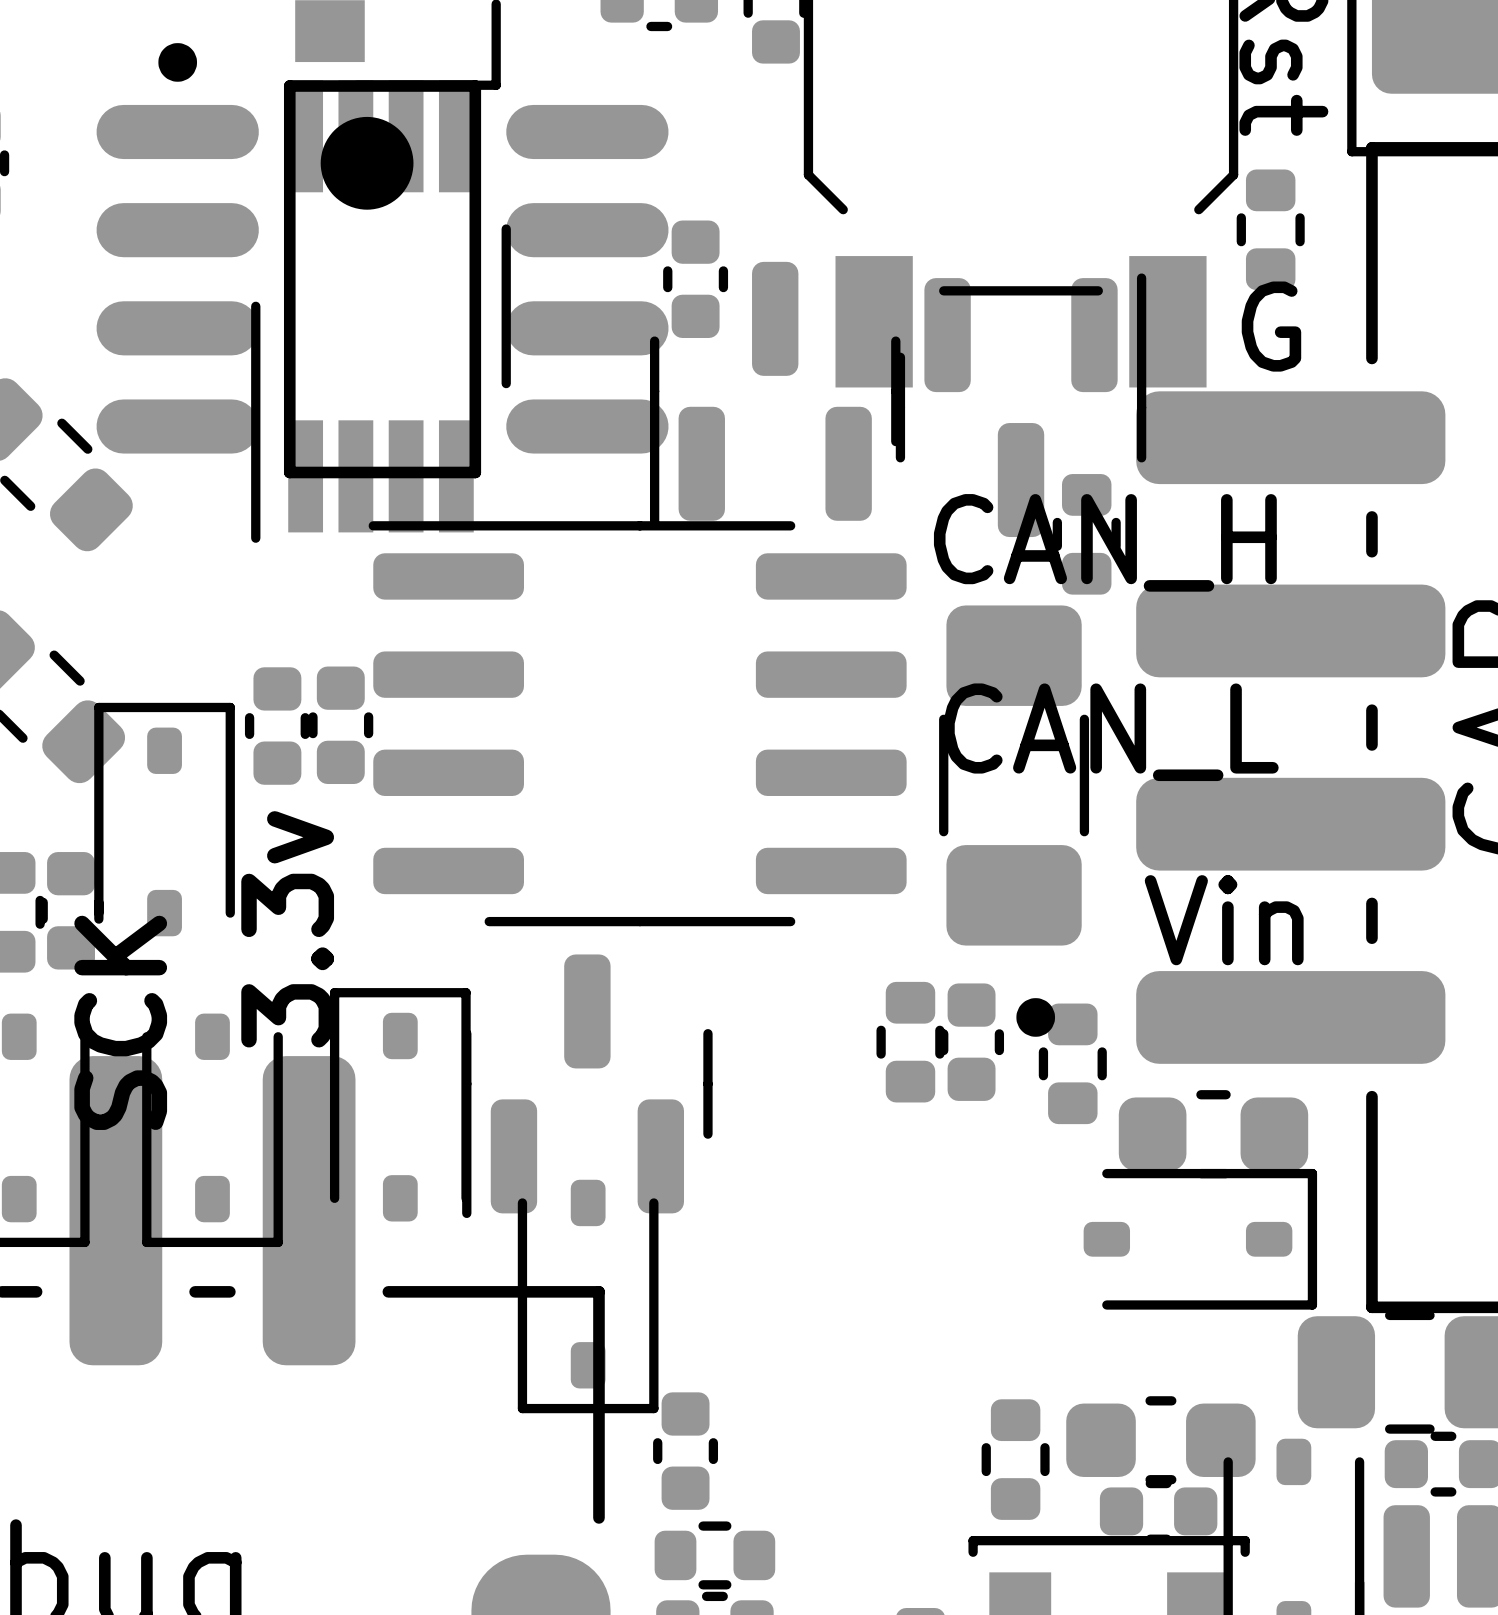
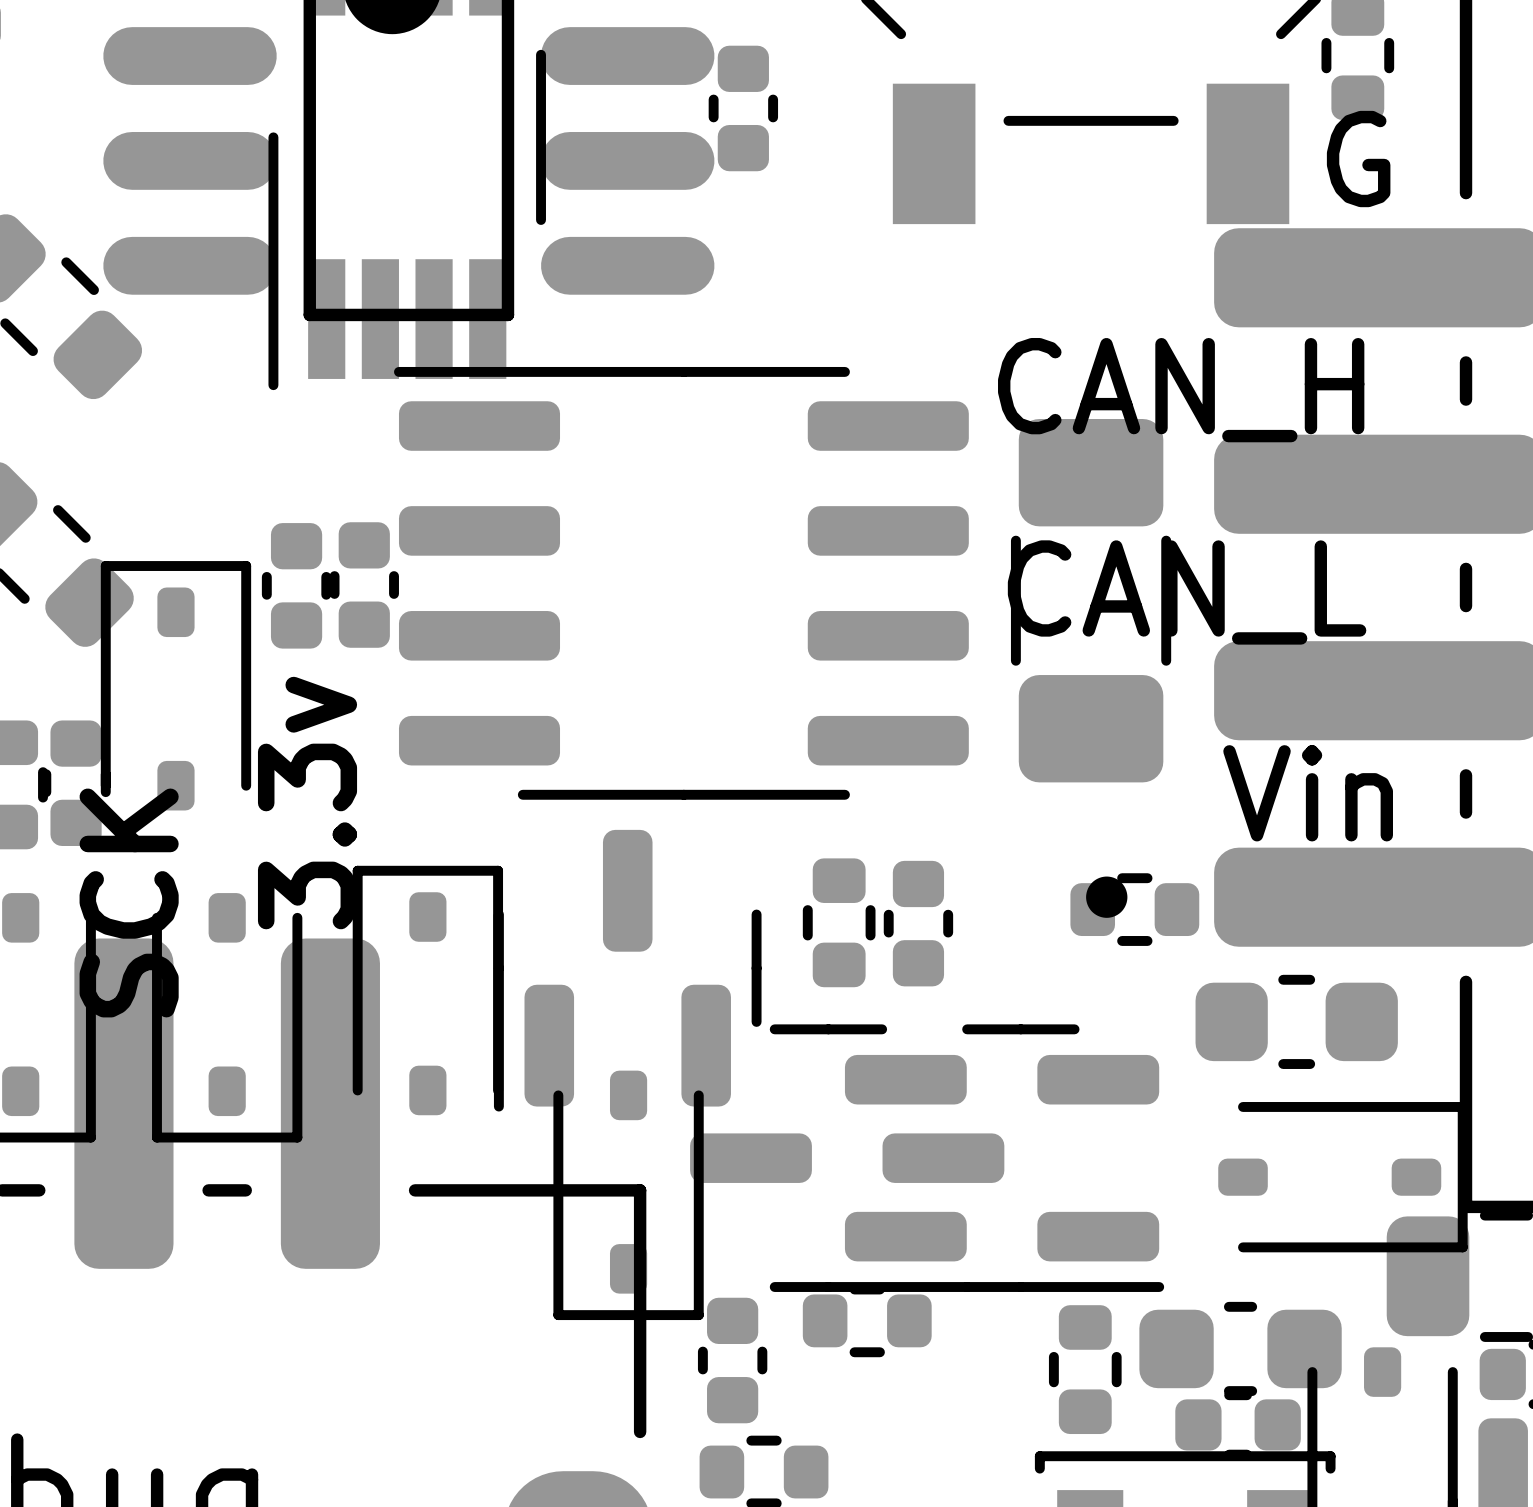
part: (775, 393) -> none
part: (1021, 405) -> none
part: (1086, 534) -> none
part position: (1014, 775) -> (1091, 600)
part footprint: [876, 981, 945, 1103] -> [883, 860, 954, 987]
part: none -> (839, 922)
part: (971, 1042) -> none
part rotation: 0° (1072, 1063) -> 90° clockwise (1134, 909)
part position: (1200, 1239) -> (1342, 1177)
part: none -> (830, 1158)
part: none -> (1023, 1158)
part: none -> (867, 1320)

